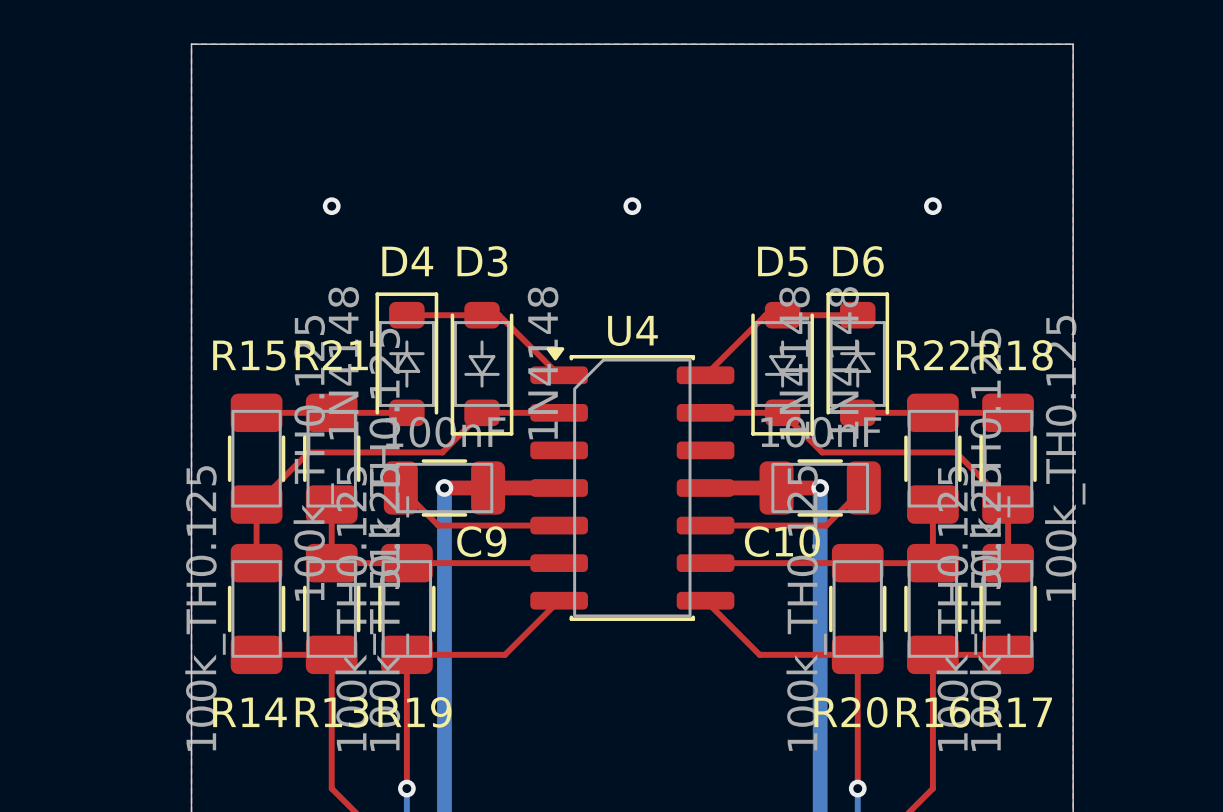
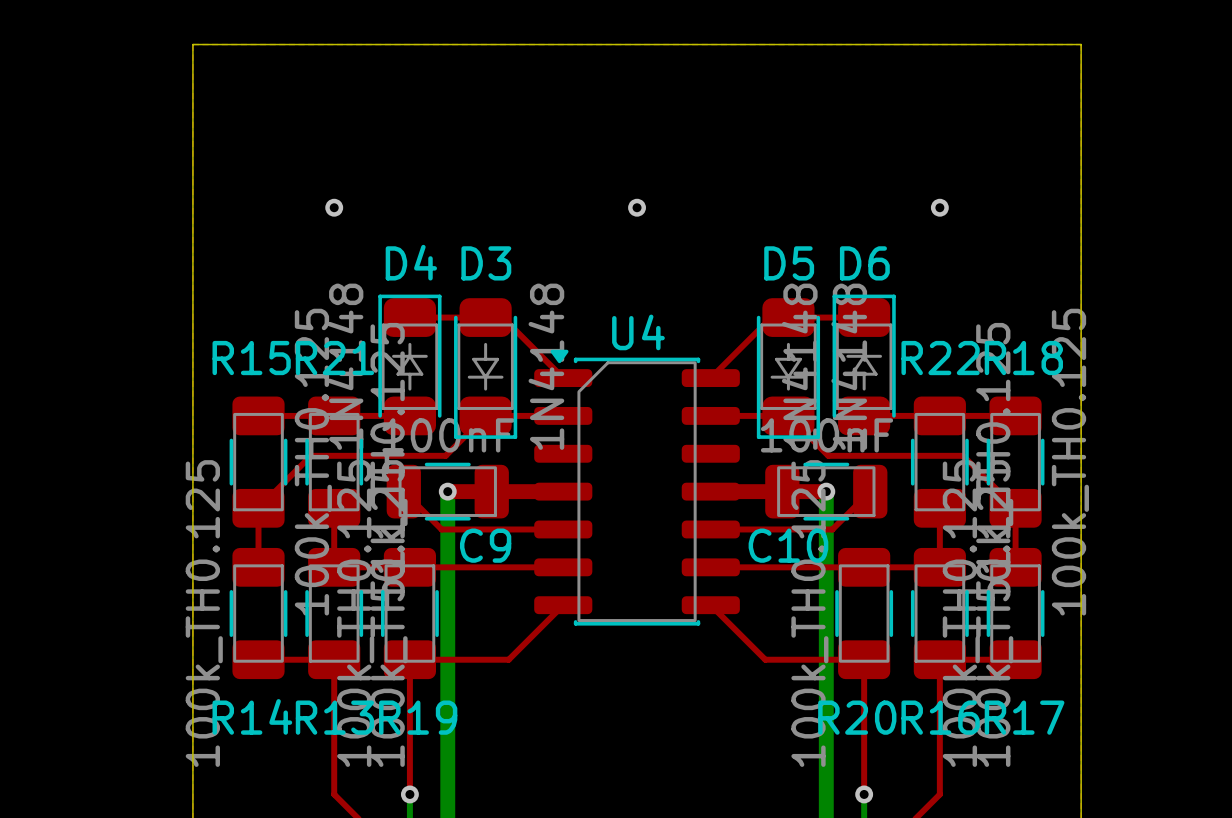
D4 footprint: [375, 292, 439, 427] -> [378, 294, 442, 436]
D6 footprint: [826, 292, 890, 427] -> [832, 294, 896, 436]
D3 footprint: [450, 301, 514, 436] -> [454, 298, 518, 439]
D5 footprint: [751, 301, 814, 436] -> [756, 298, 821, 439]

